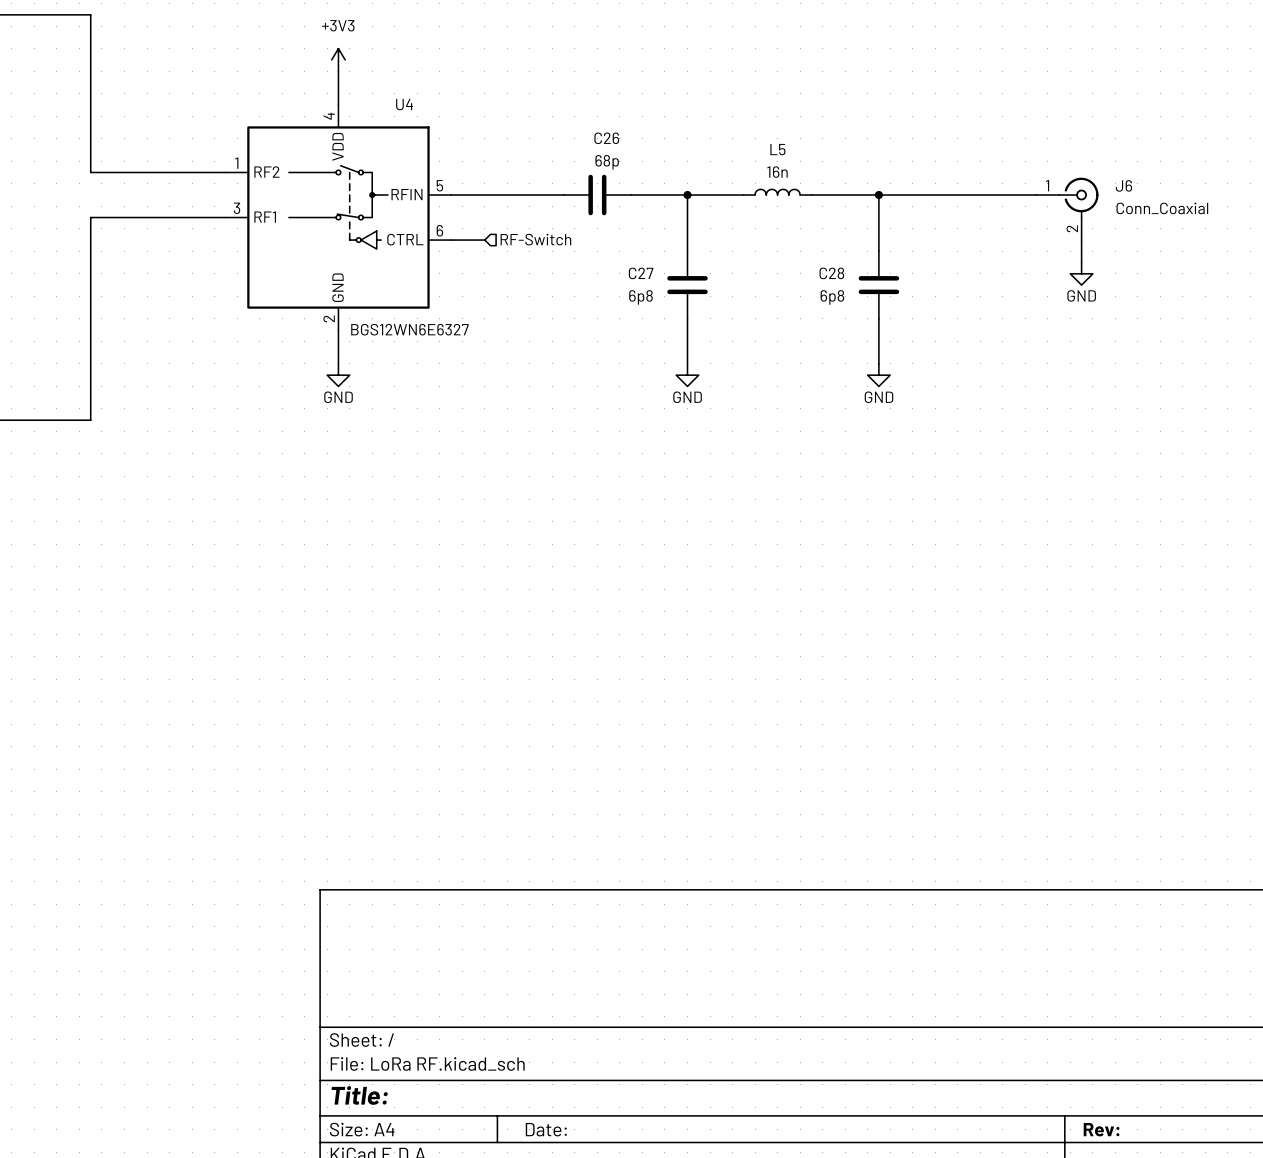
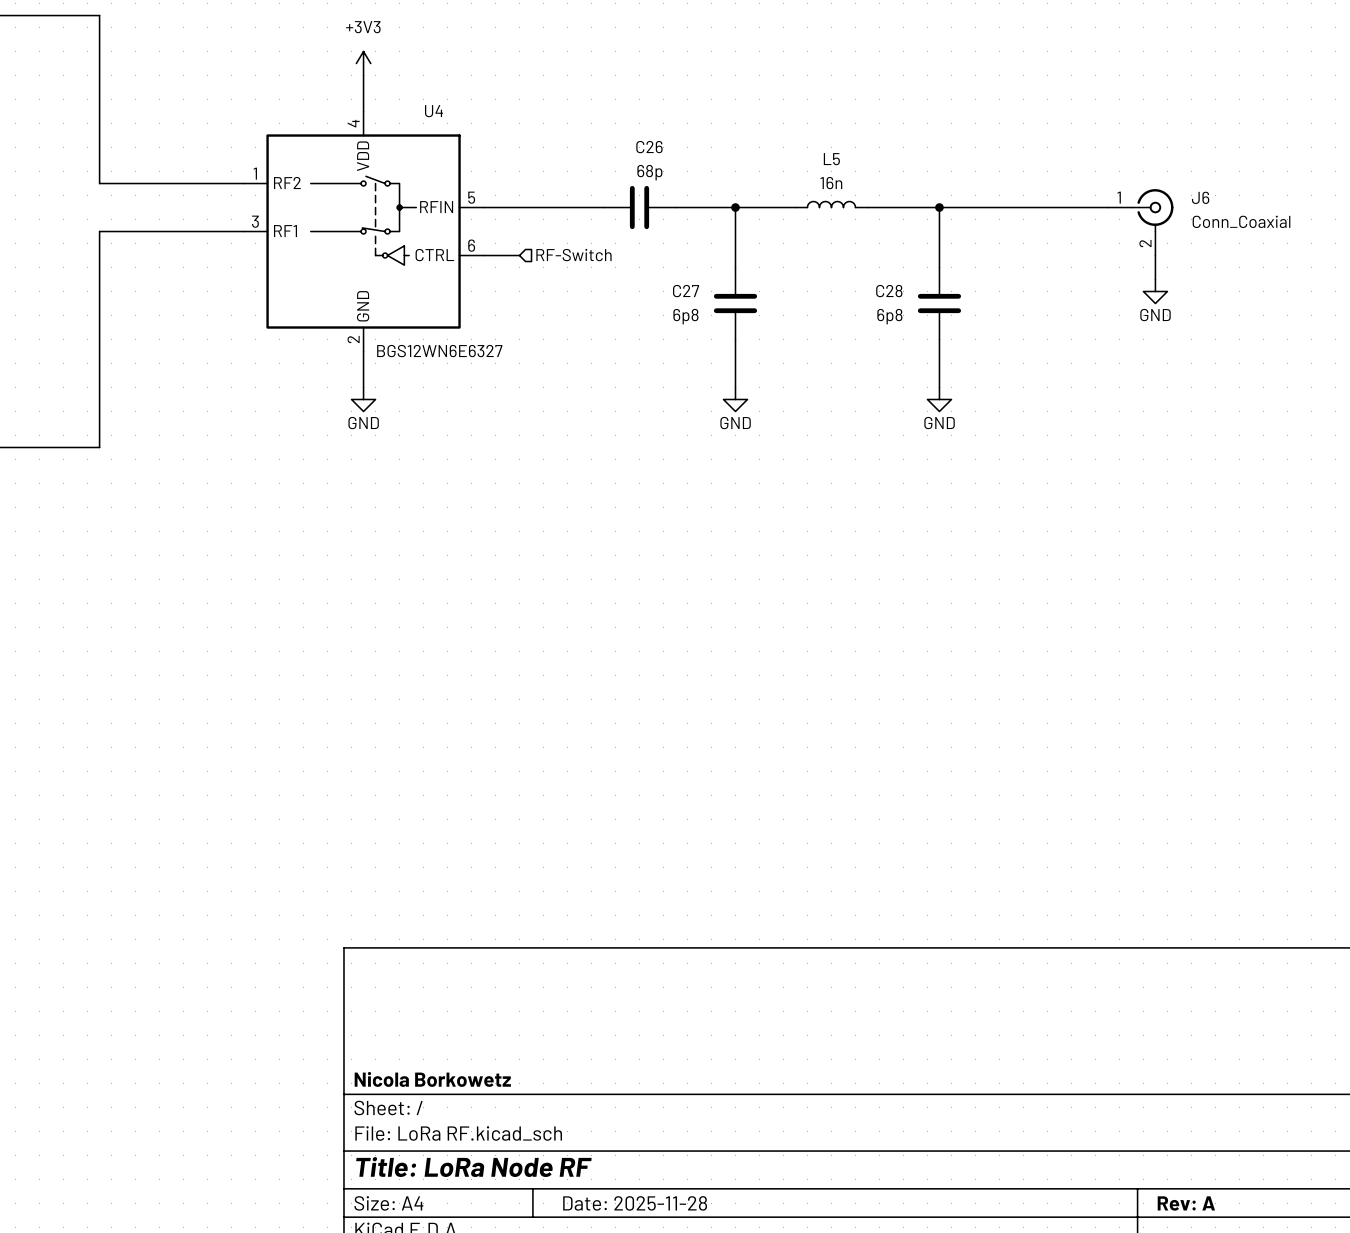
title block: none -> Nicola Borkowetz (432, 1079)
title block: Title: (359, 1095) -> Title: LoRa Node RF (473, 1167)
title block: Date: (546, 1129) -> Date: 2025-11-28 (635, 1203)
title block: Rev: (1101, 1129) -> Rev: A (1186, 1203)

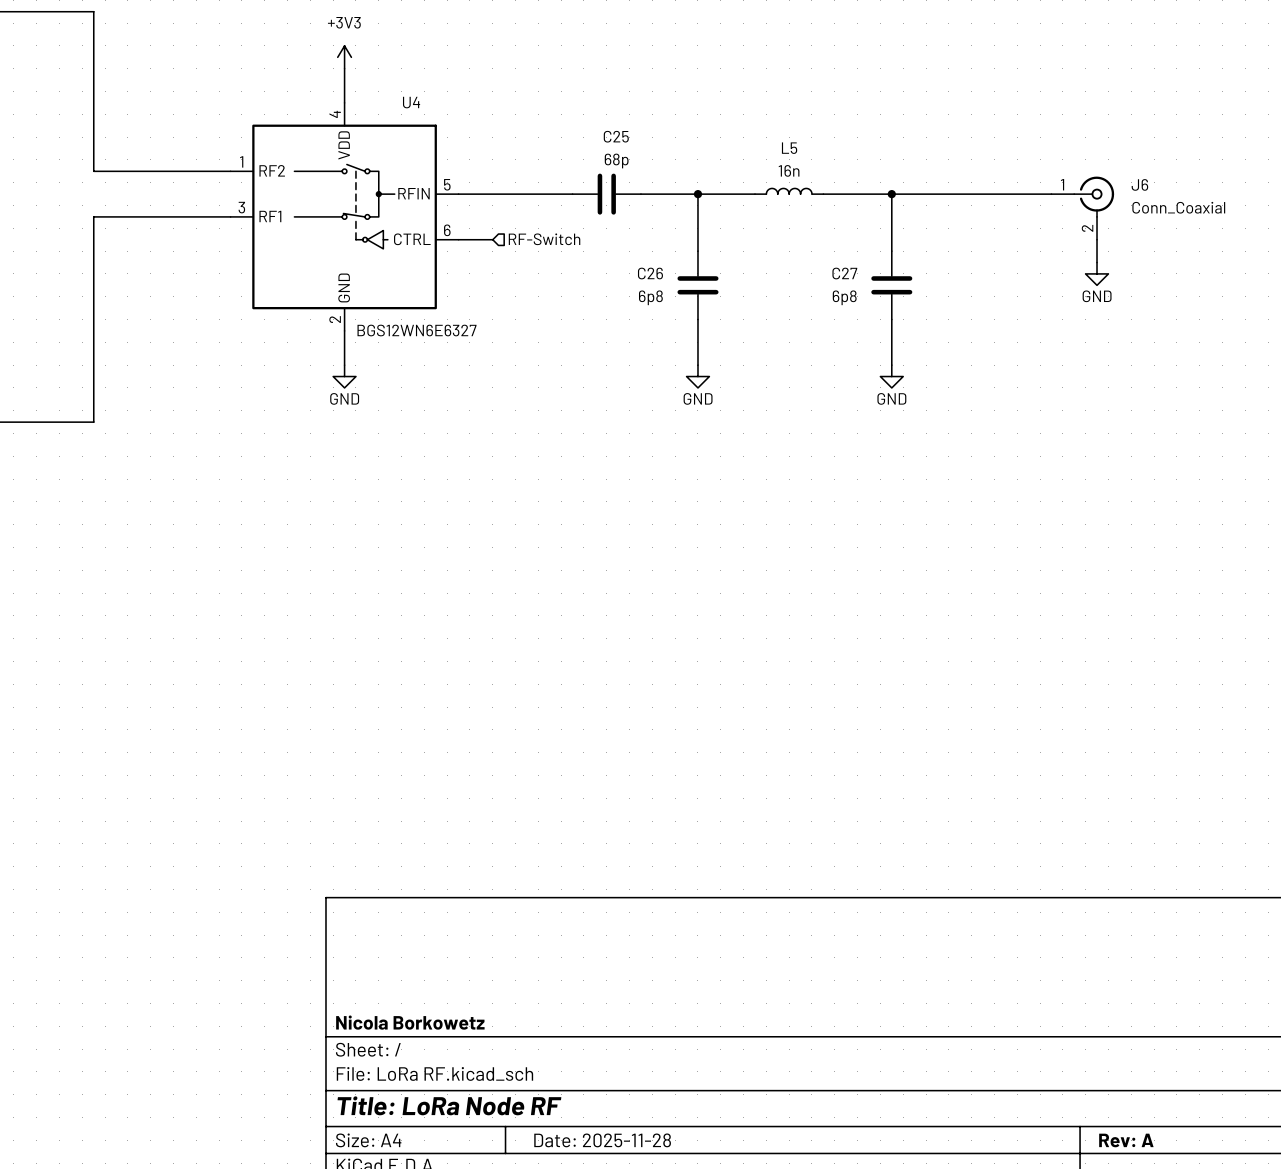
C26 name: C26 (649, 147) -> C25 (616, 136)
C27 name: C27 (686, 291) -> C26 (650, 273)
C28 name: C28 (889, 291) -> C27 (844, 273)

